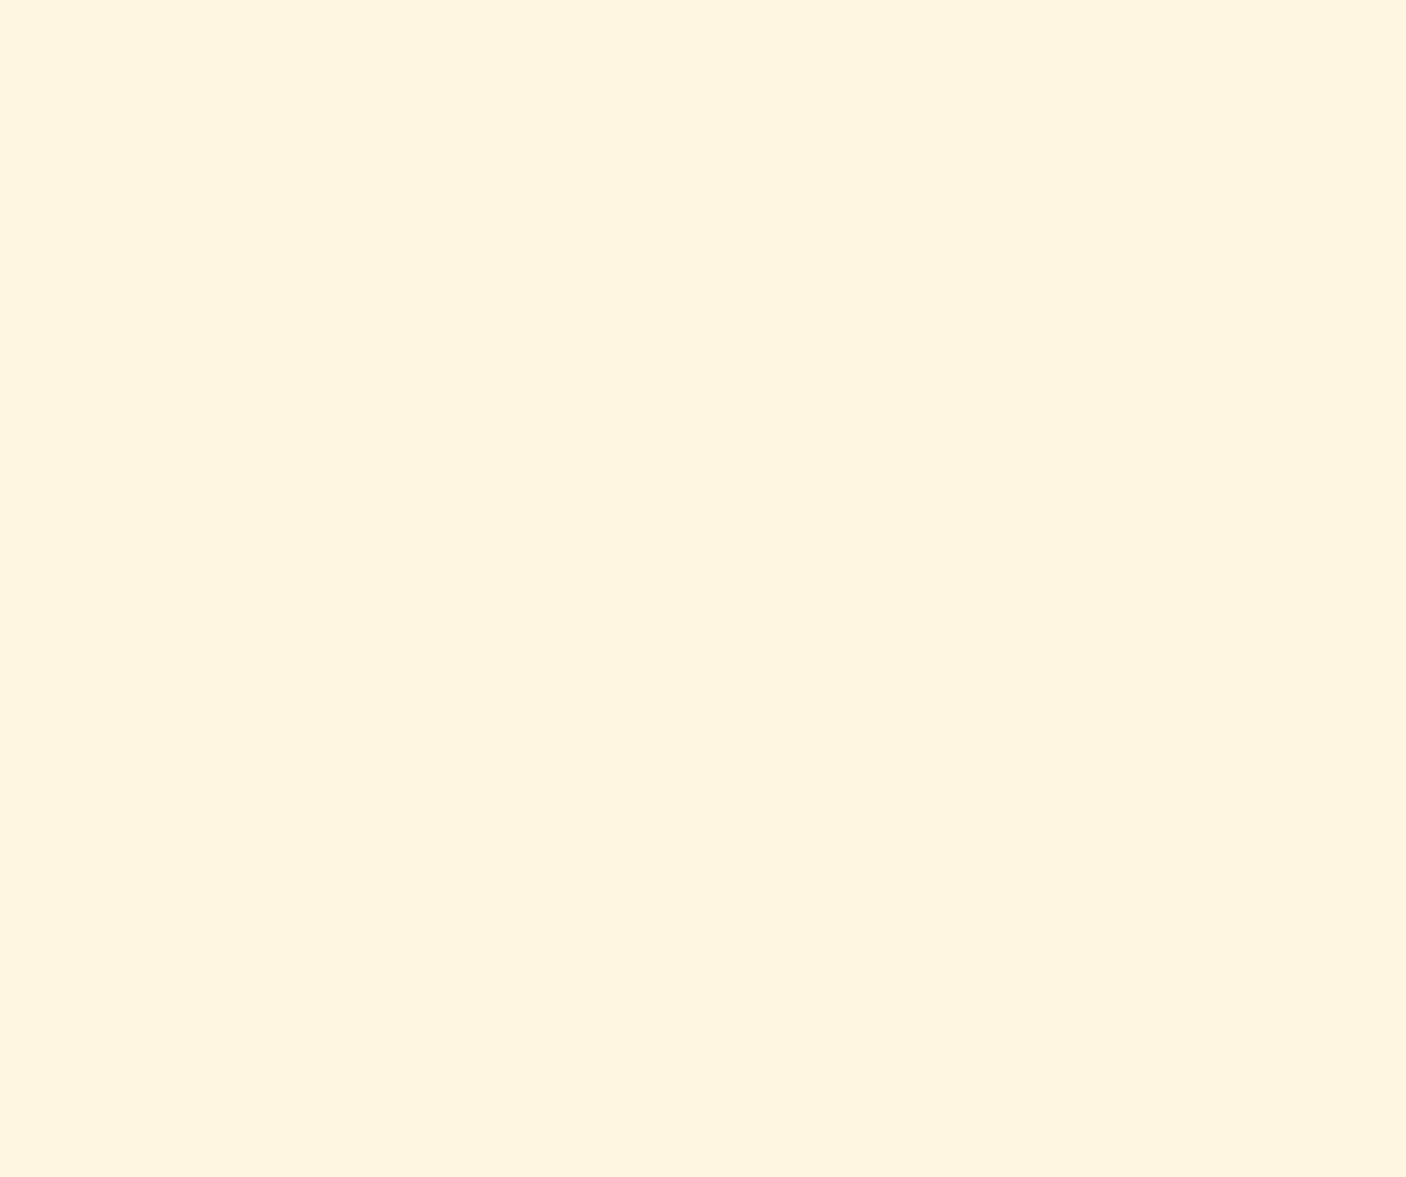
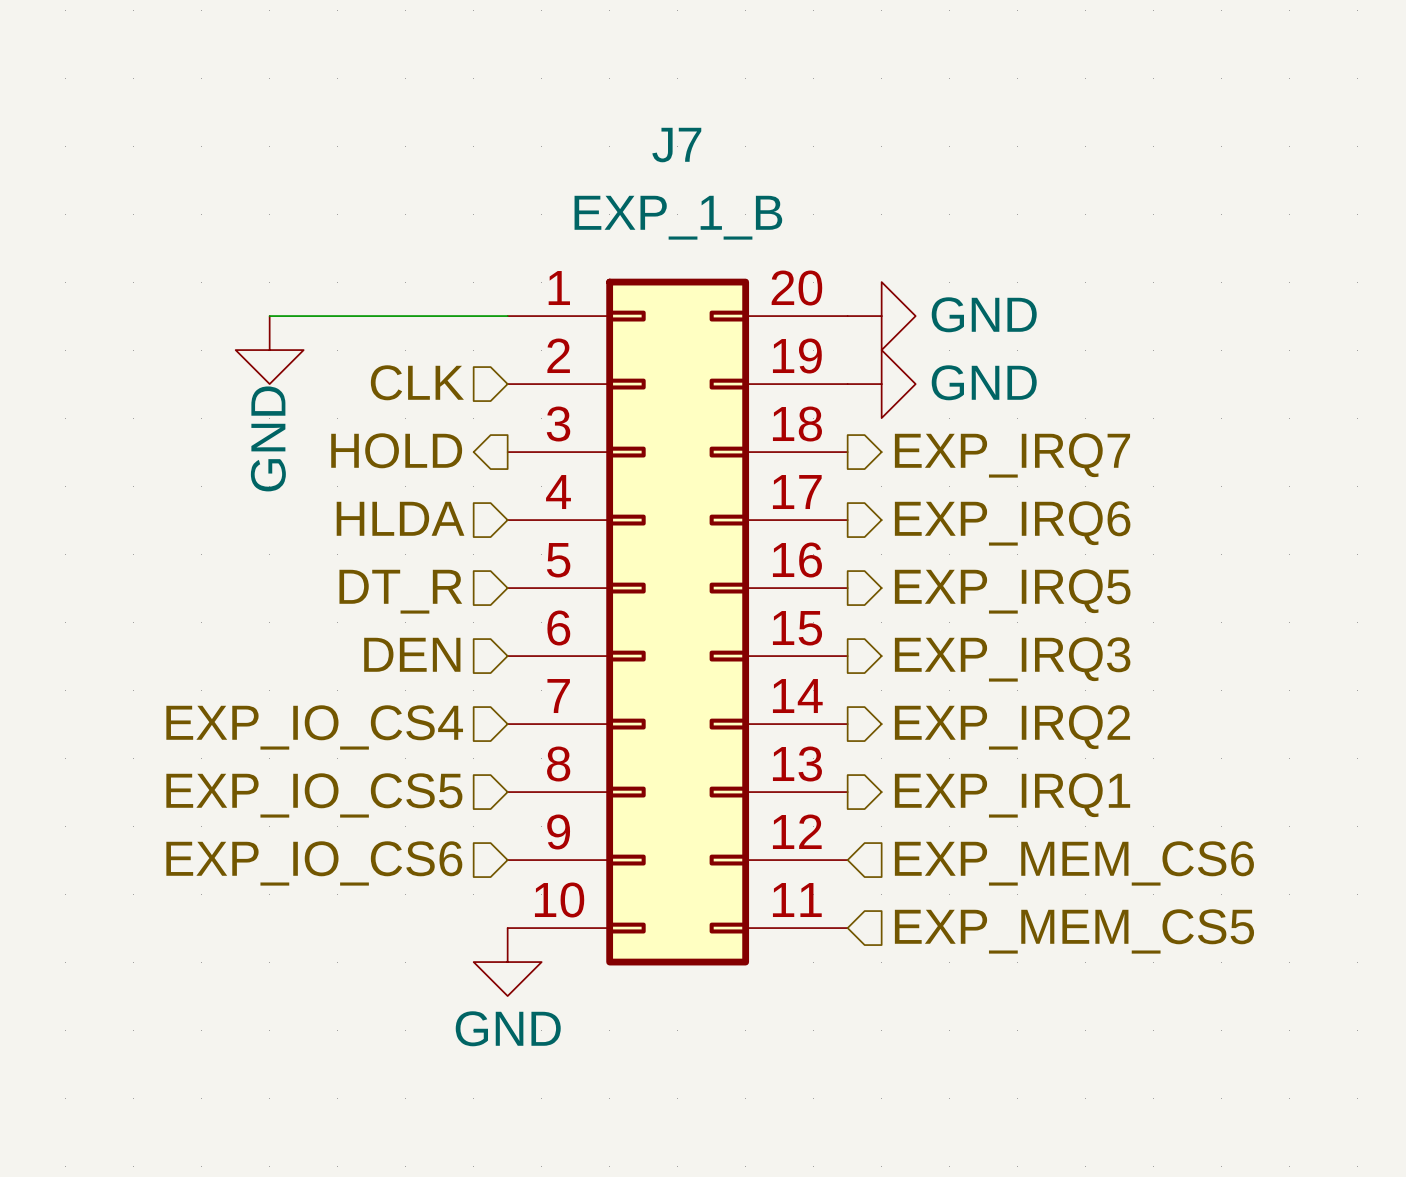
wire: none -> (269, 316) (507, 316)
power symbol: none -> GND (881, 316)
power symbol: none -> GND (269, 350)
hierarchical label: none -> CLK (417, 382)
power symbol: none -> GND (881, 384)
hierarchical label: none -> HOLD (396, 450)
hierarchical label: none -> EXP_IRQ7 (1012, 455)
hierarchical label: none -> HLDA (400, 518)
hierarchical label: none -> EXP_IRQ6 (1012, 523)
hierarchical label: none -> DT_R (400, 591)
hierarchical label: none -> EXP_IRQ5 (1012, 591)
J7: none -> EXP_1_B (677, 622)
hierarchical label: none -> DEN (412, 654)
hierarchical label: none -> EXP_IRQ3 (1012, 659)
hierarchical label: none -> EXP_IO_CS4 (314, 727)
hierarchical label: none -> EXP_IRQ2 (1012, 727)
hierarchical label: none -> EXP_IO_CS5 (314, 795)
hierarchical label: none -> EXP_IRQ1 (1012, 795)
hierarchical label: none -> EXP_IO_CS6 (314, 863)
hierarchical label: none -> EXP_MEM_CS6 (1074, 863)
hierarchical label: none -> EXP_MEM_CS5 (1074, 931)
power symbol: none -> GND (507, 962)

